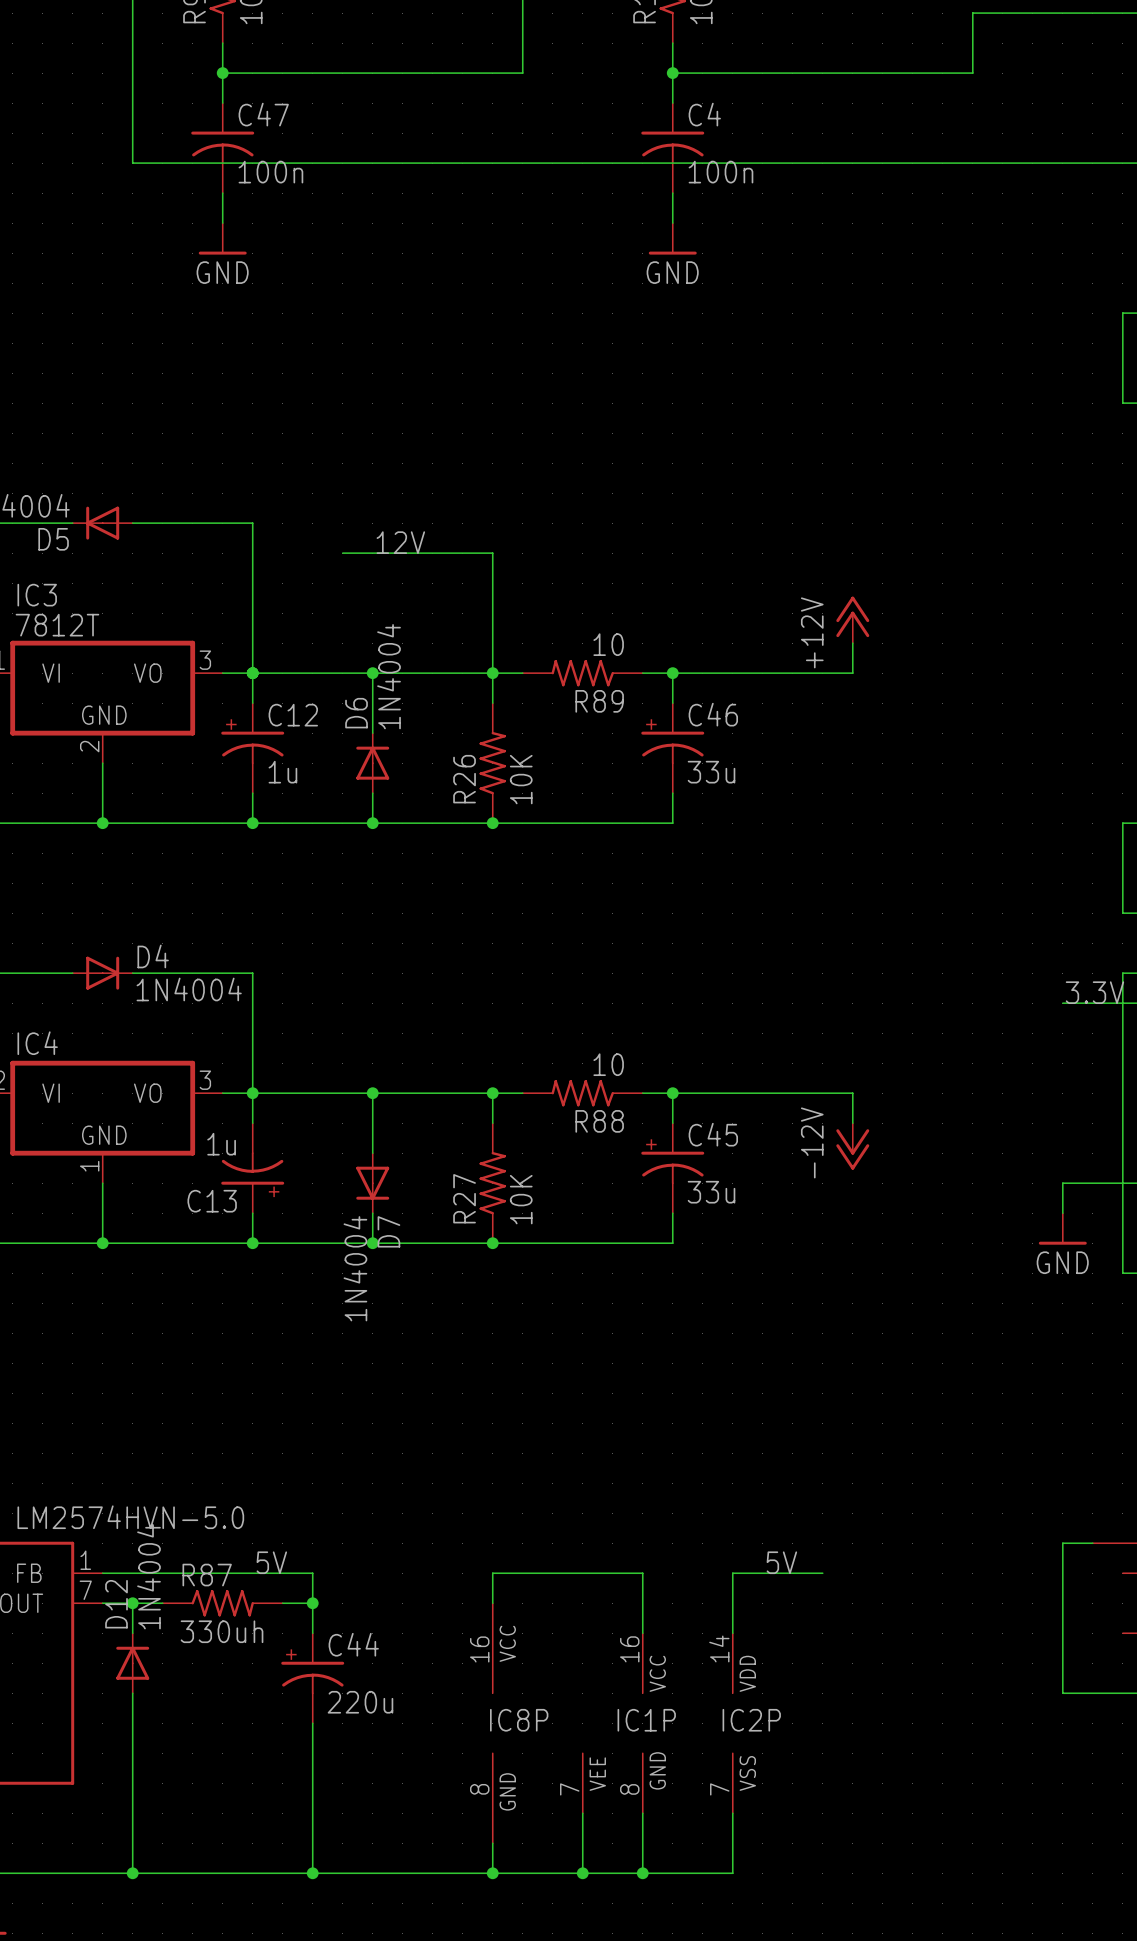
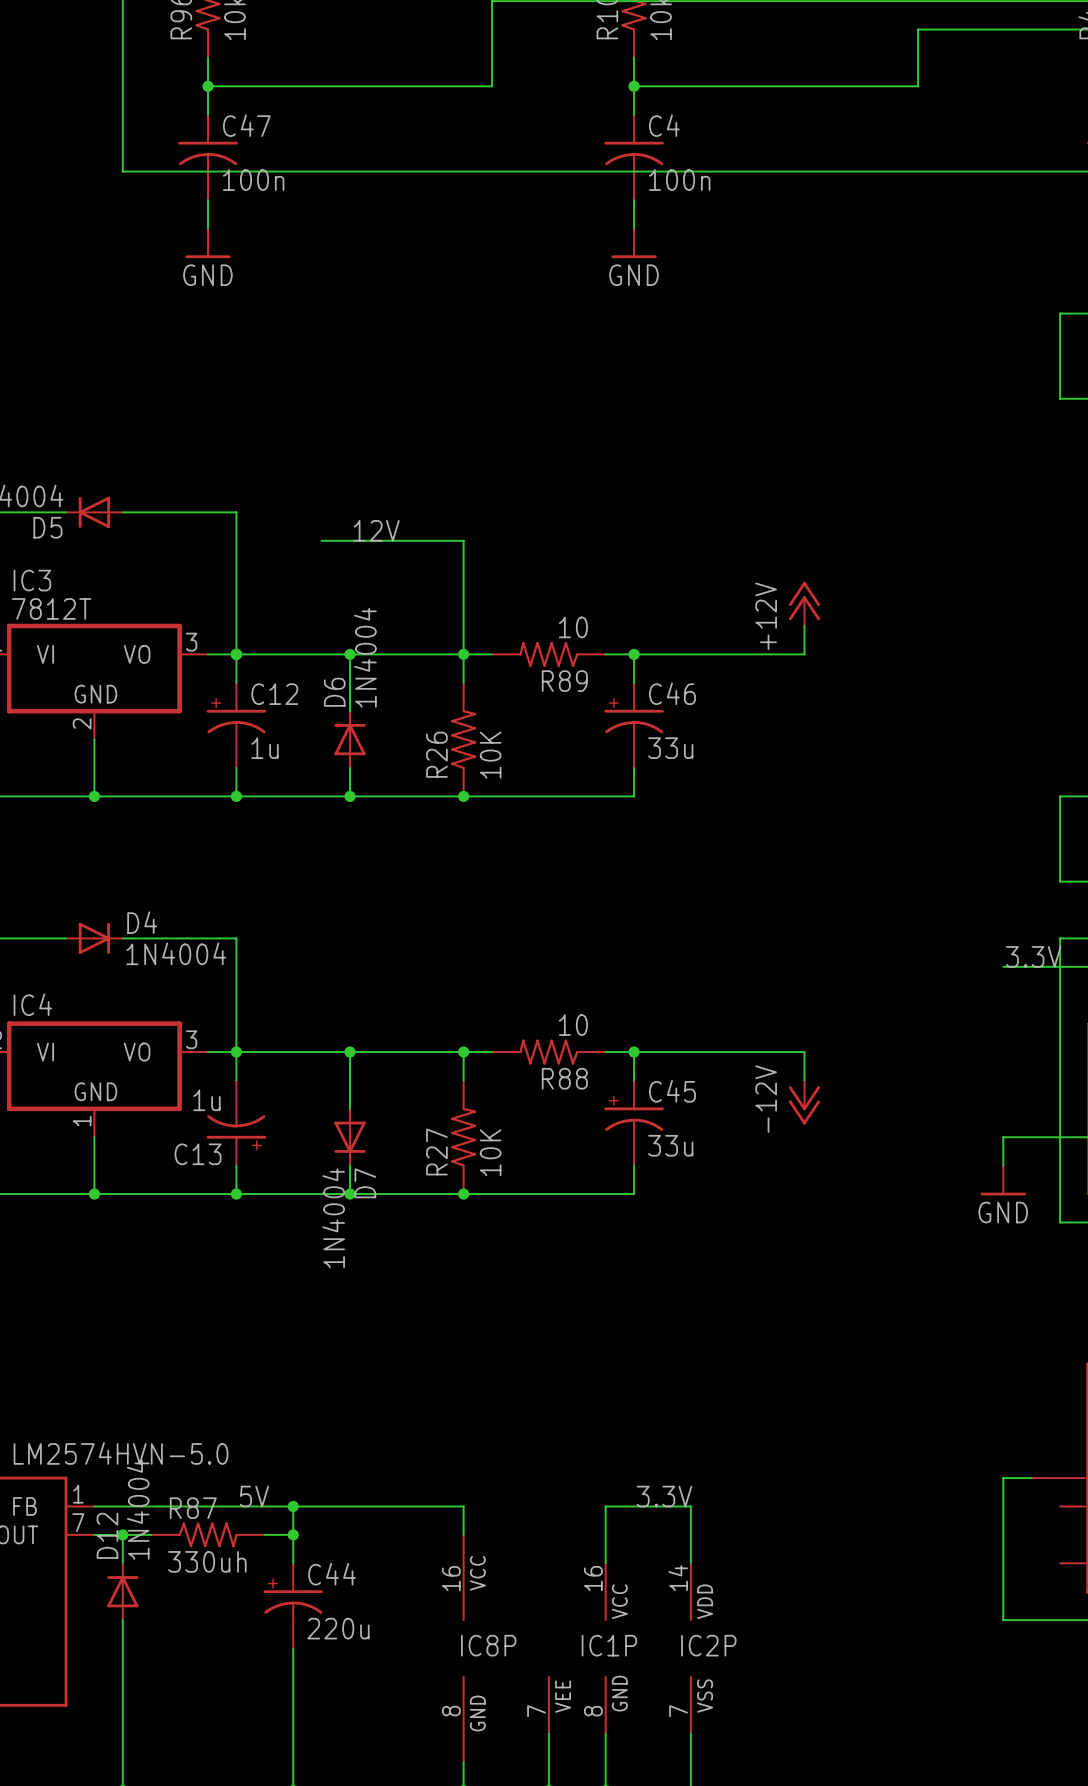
label: none -> 3.3V (664, 1496)
label: 5V (781, 1562) -> none
junction: none -> (293, 1506)
wire: (492, 1573) (642, 1573) -> (463, 1506) (293, 1506)
wire: (732, 1573) (822, 1573) -> (690, 1506) (605, 1506)

